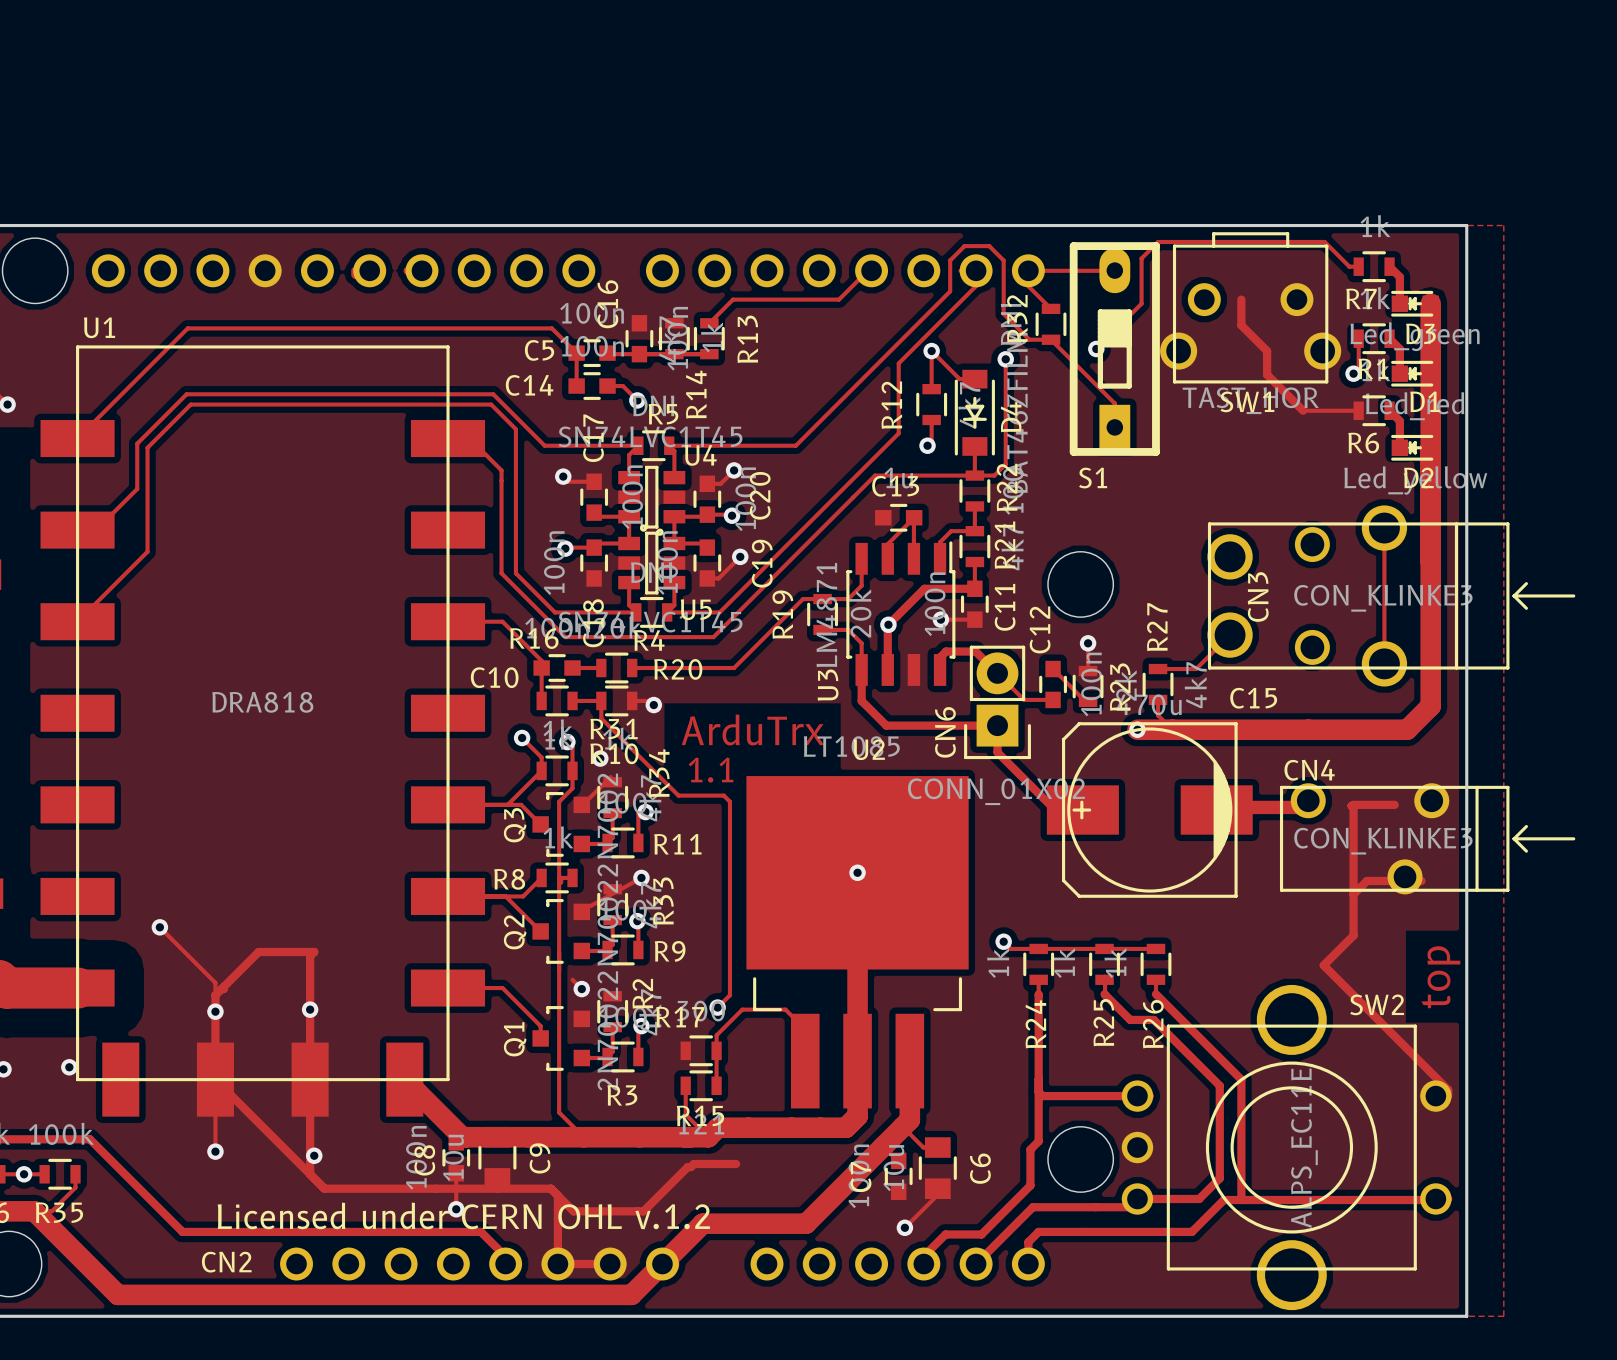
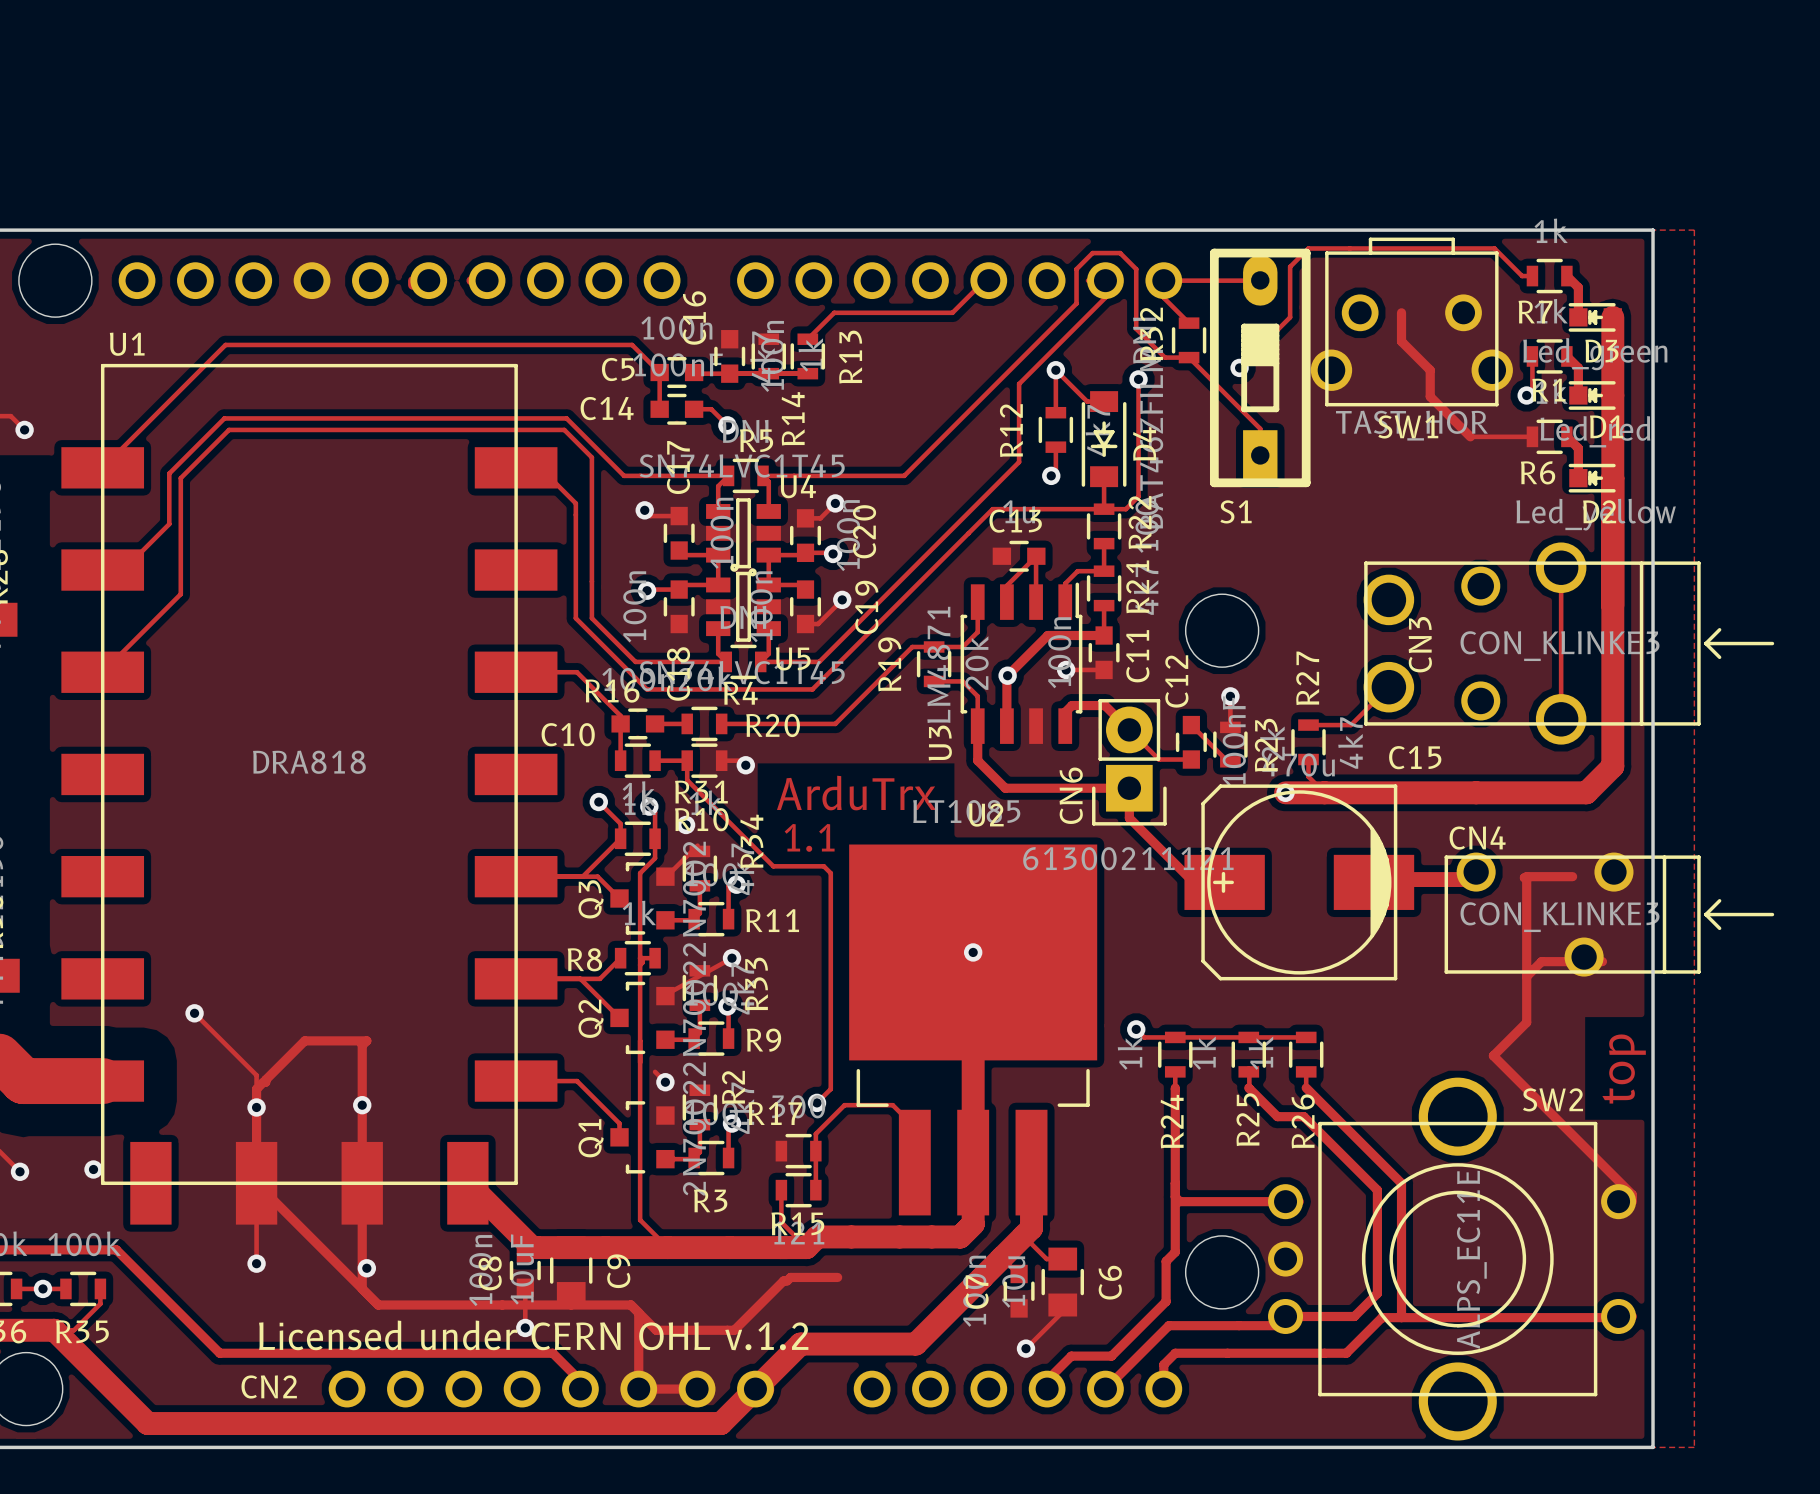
C14 value: 100n (592, 346) -> 100nF (677, 364)
C12 value: 100n (1091, 684) -> 100nF (1234, 741)
CN6 value: CONN_01X02 (996, 791) -> 61300211121 (1128, 858)
C9 value: 10u (453, 1157) -> 10uF (522, 1269)

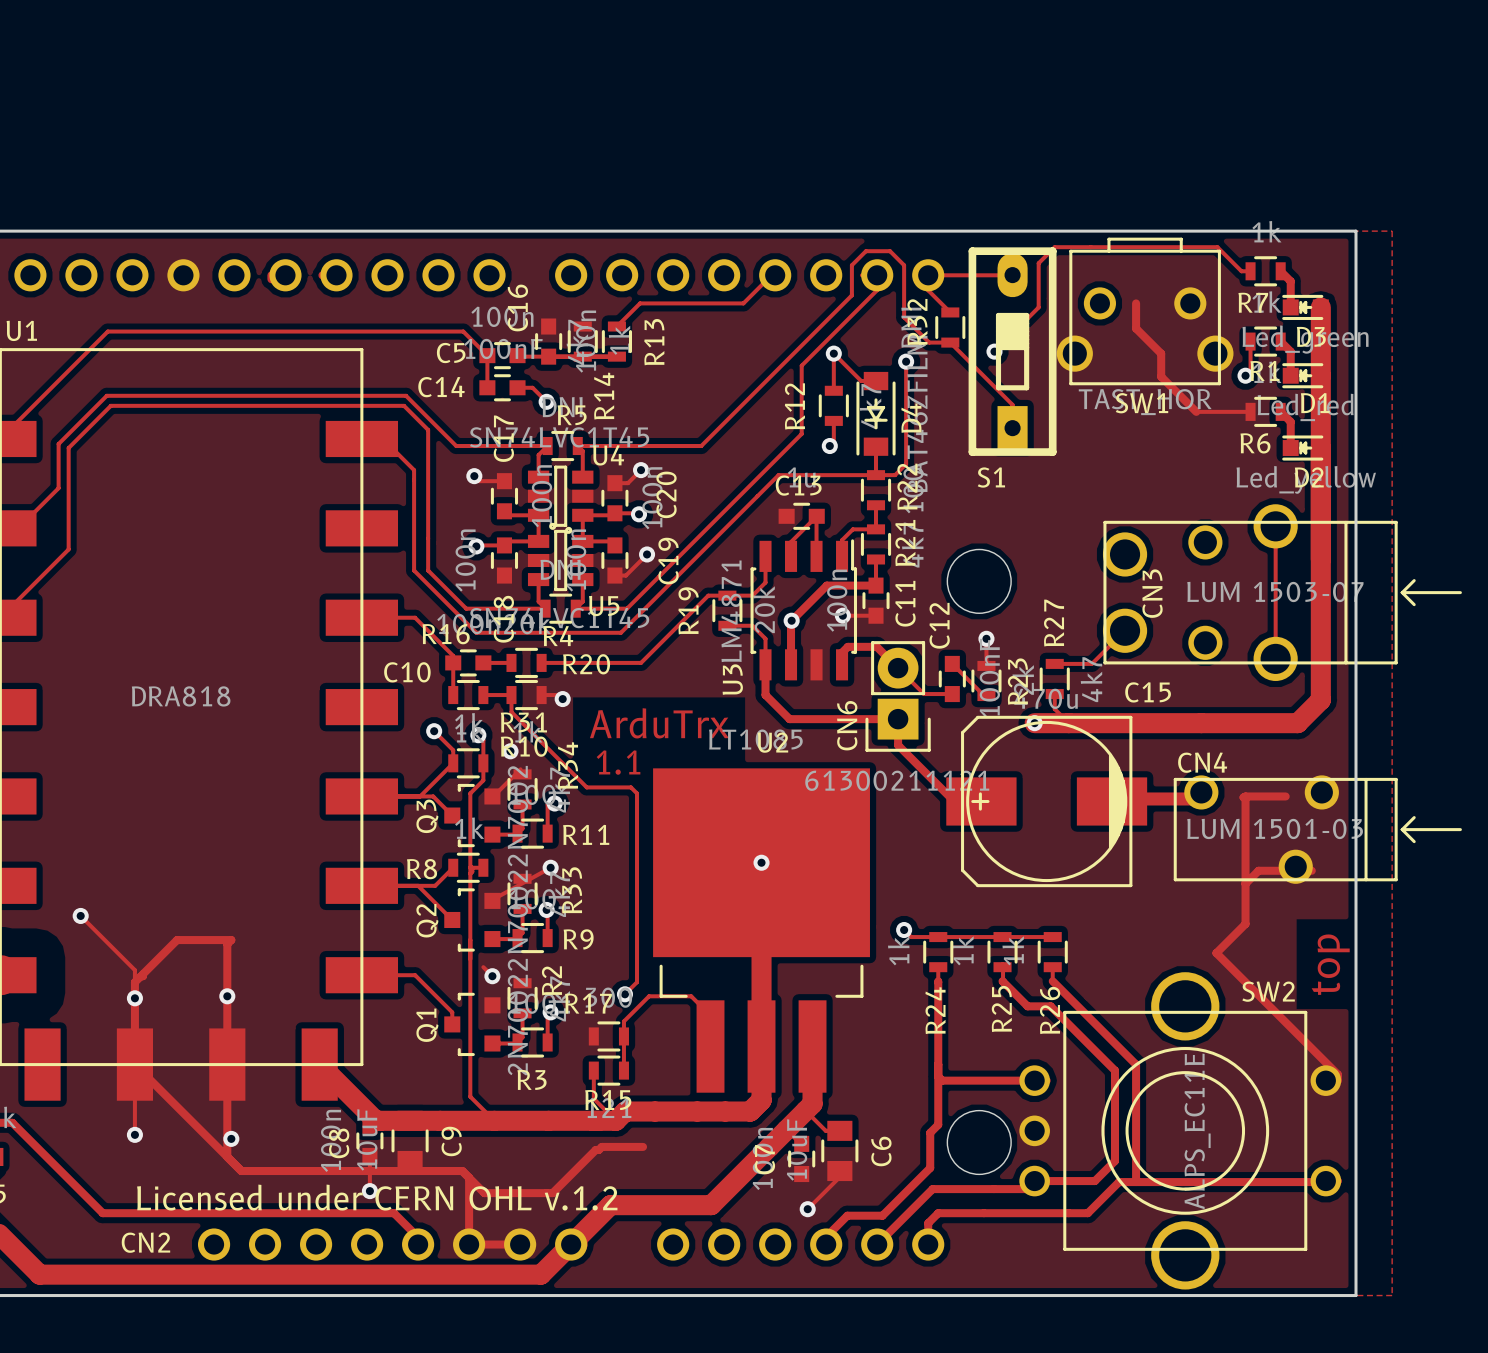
CN3 value: CON_KLINKE3 (1559, 646) -> LUM 1503-07 (1275, 591)
CN4 value: CON_KLINKE3 (1559, 917) -> LUM 1501-03 (1275, 828)
C6 value: 10u (1013, 1282) -> 10uF (797, 1150)

